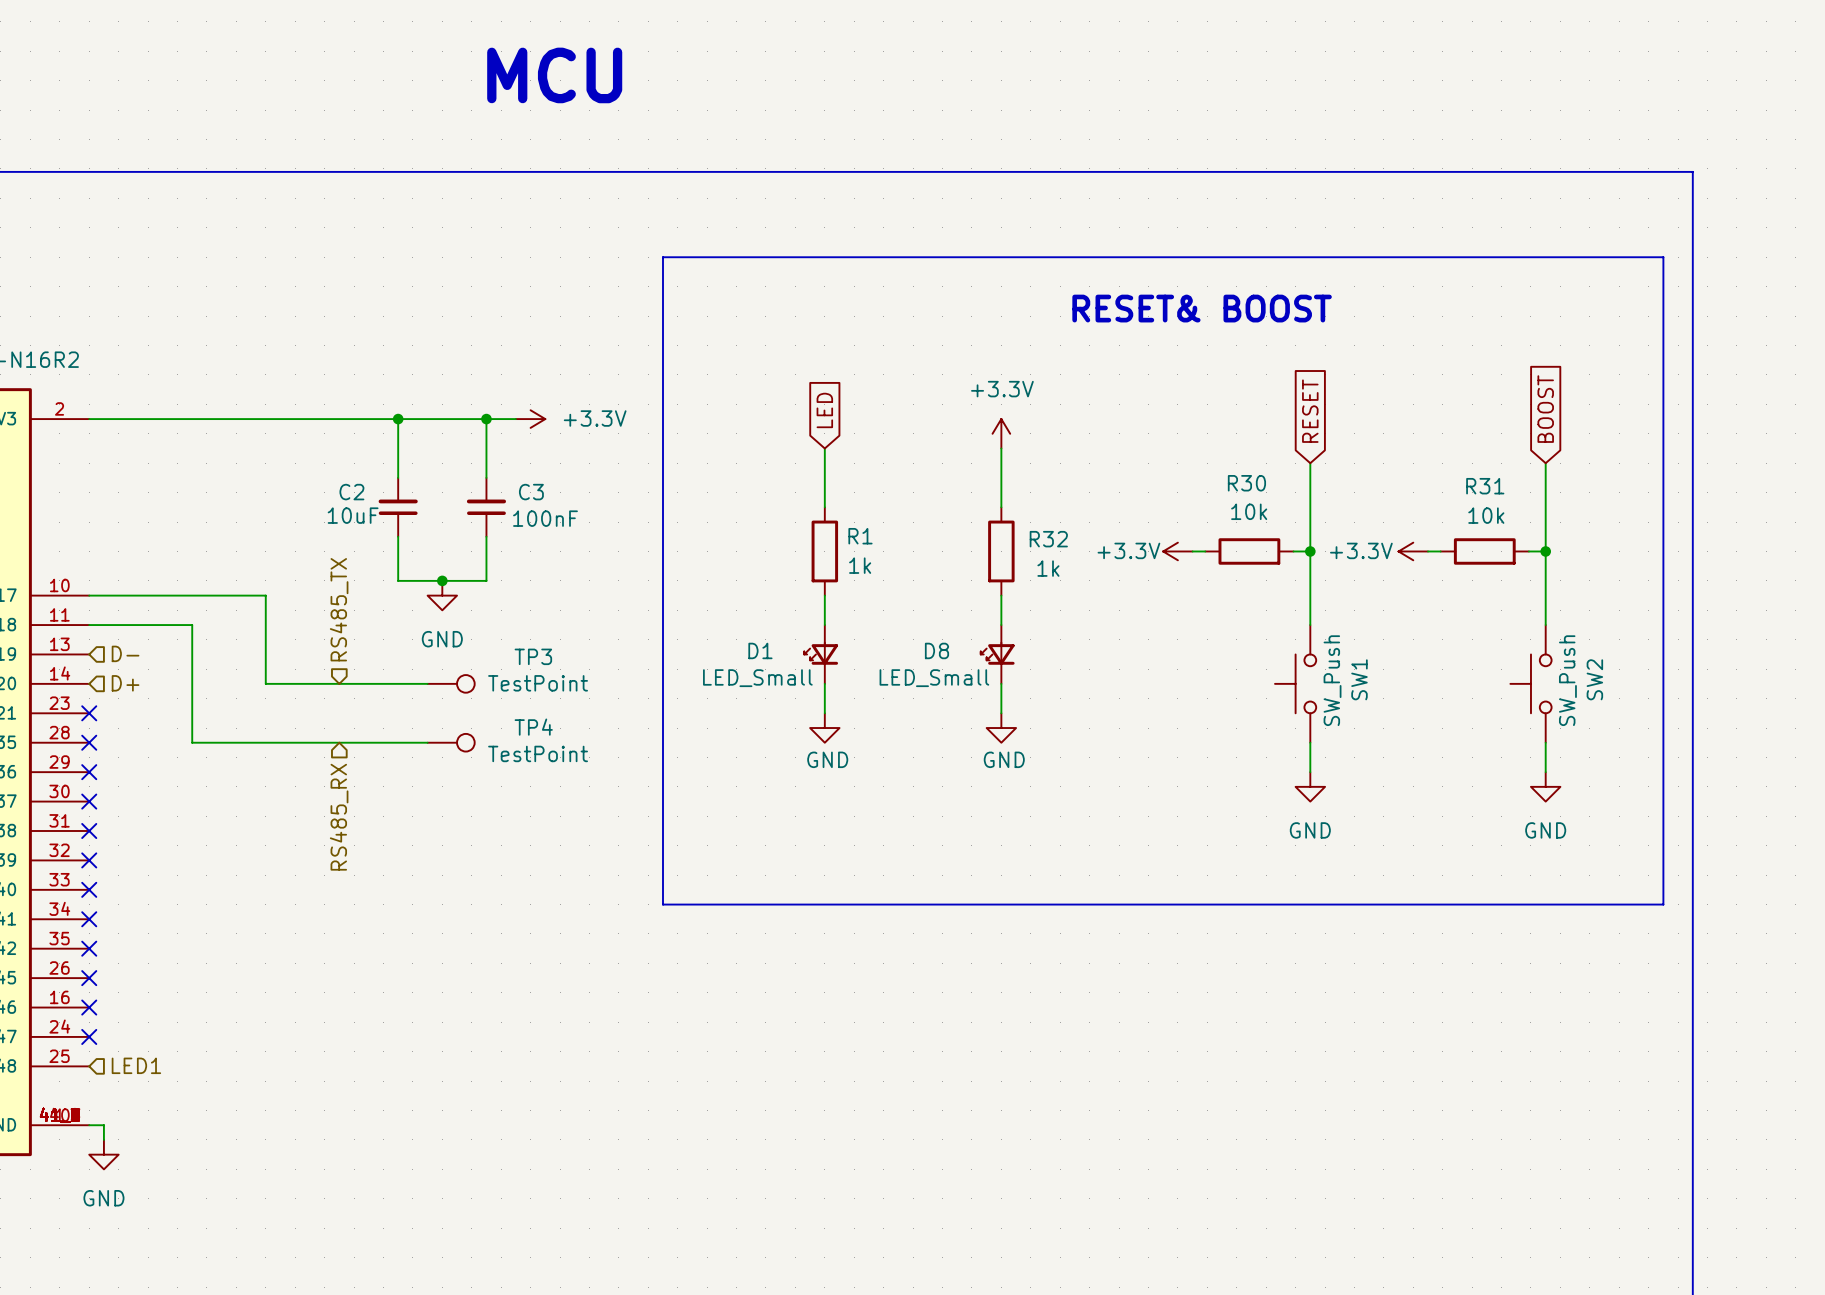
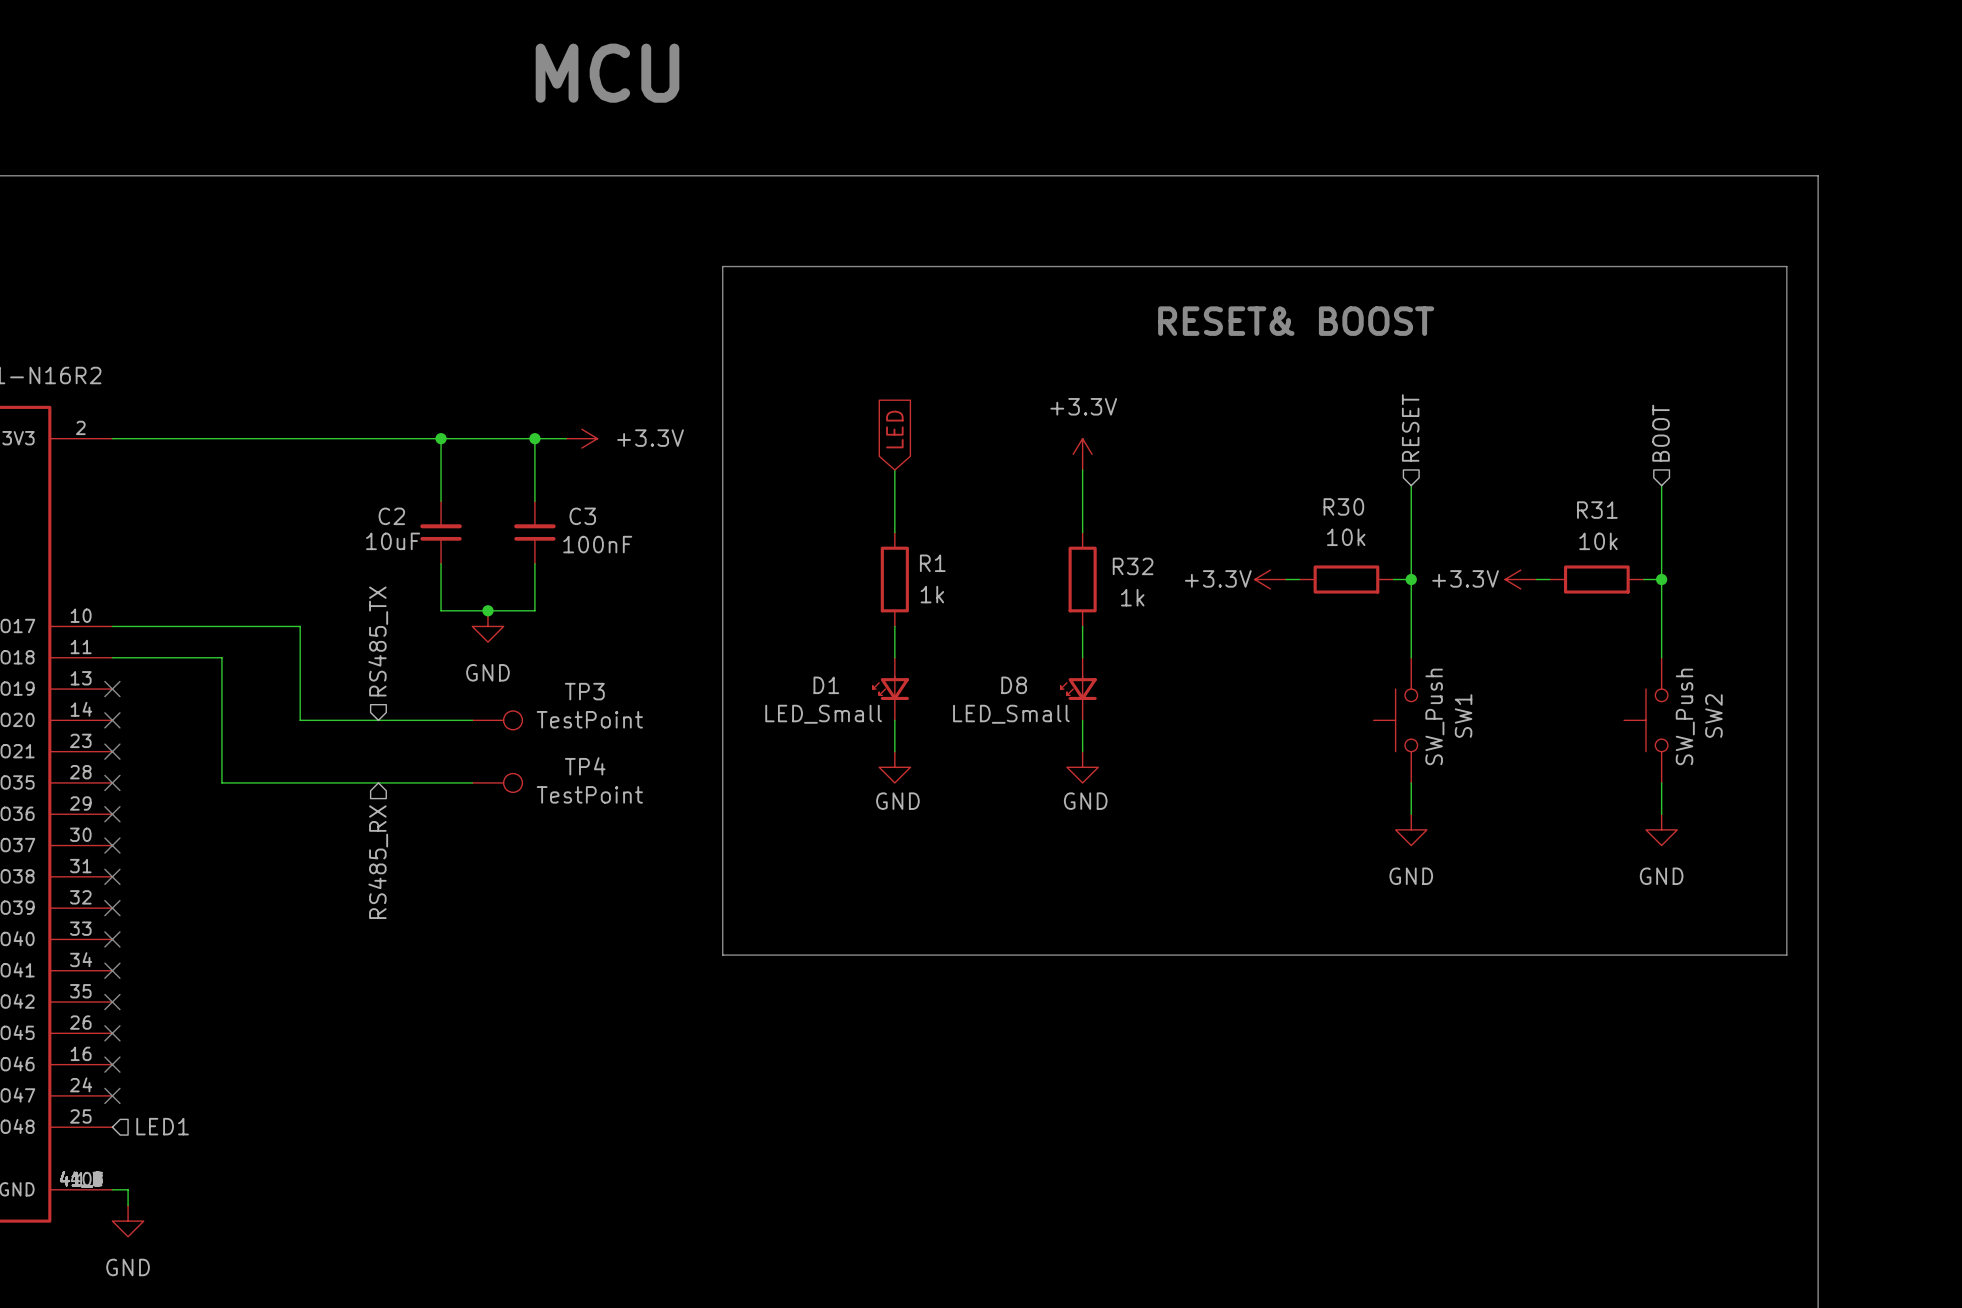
hierarchical label: none -> RESET (1410, 427)
global label: BOOST (1545, 409) -> none
global label: RESET (1310, 411) -> none
hierarchical label: none -> BOOT (1661, 433)
hierarchical label: D- (125, 653) -> none
no-connect mark: none -> (112, 689)
no-connect mark: none -> (112, 720)
hierarchical label: D+ (125, 683) -> none

